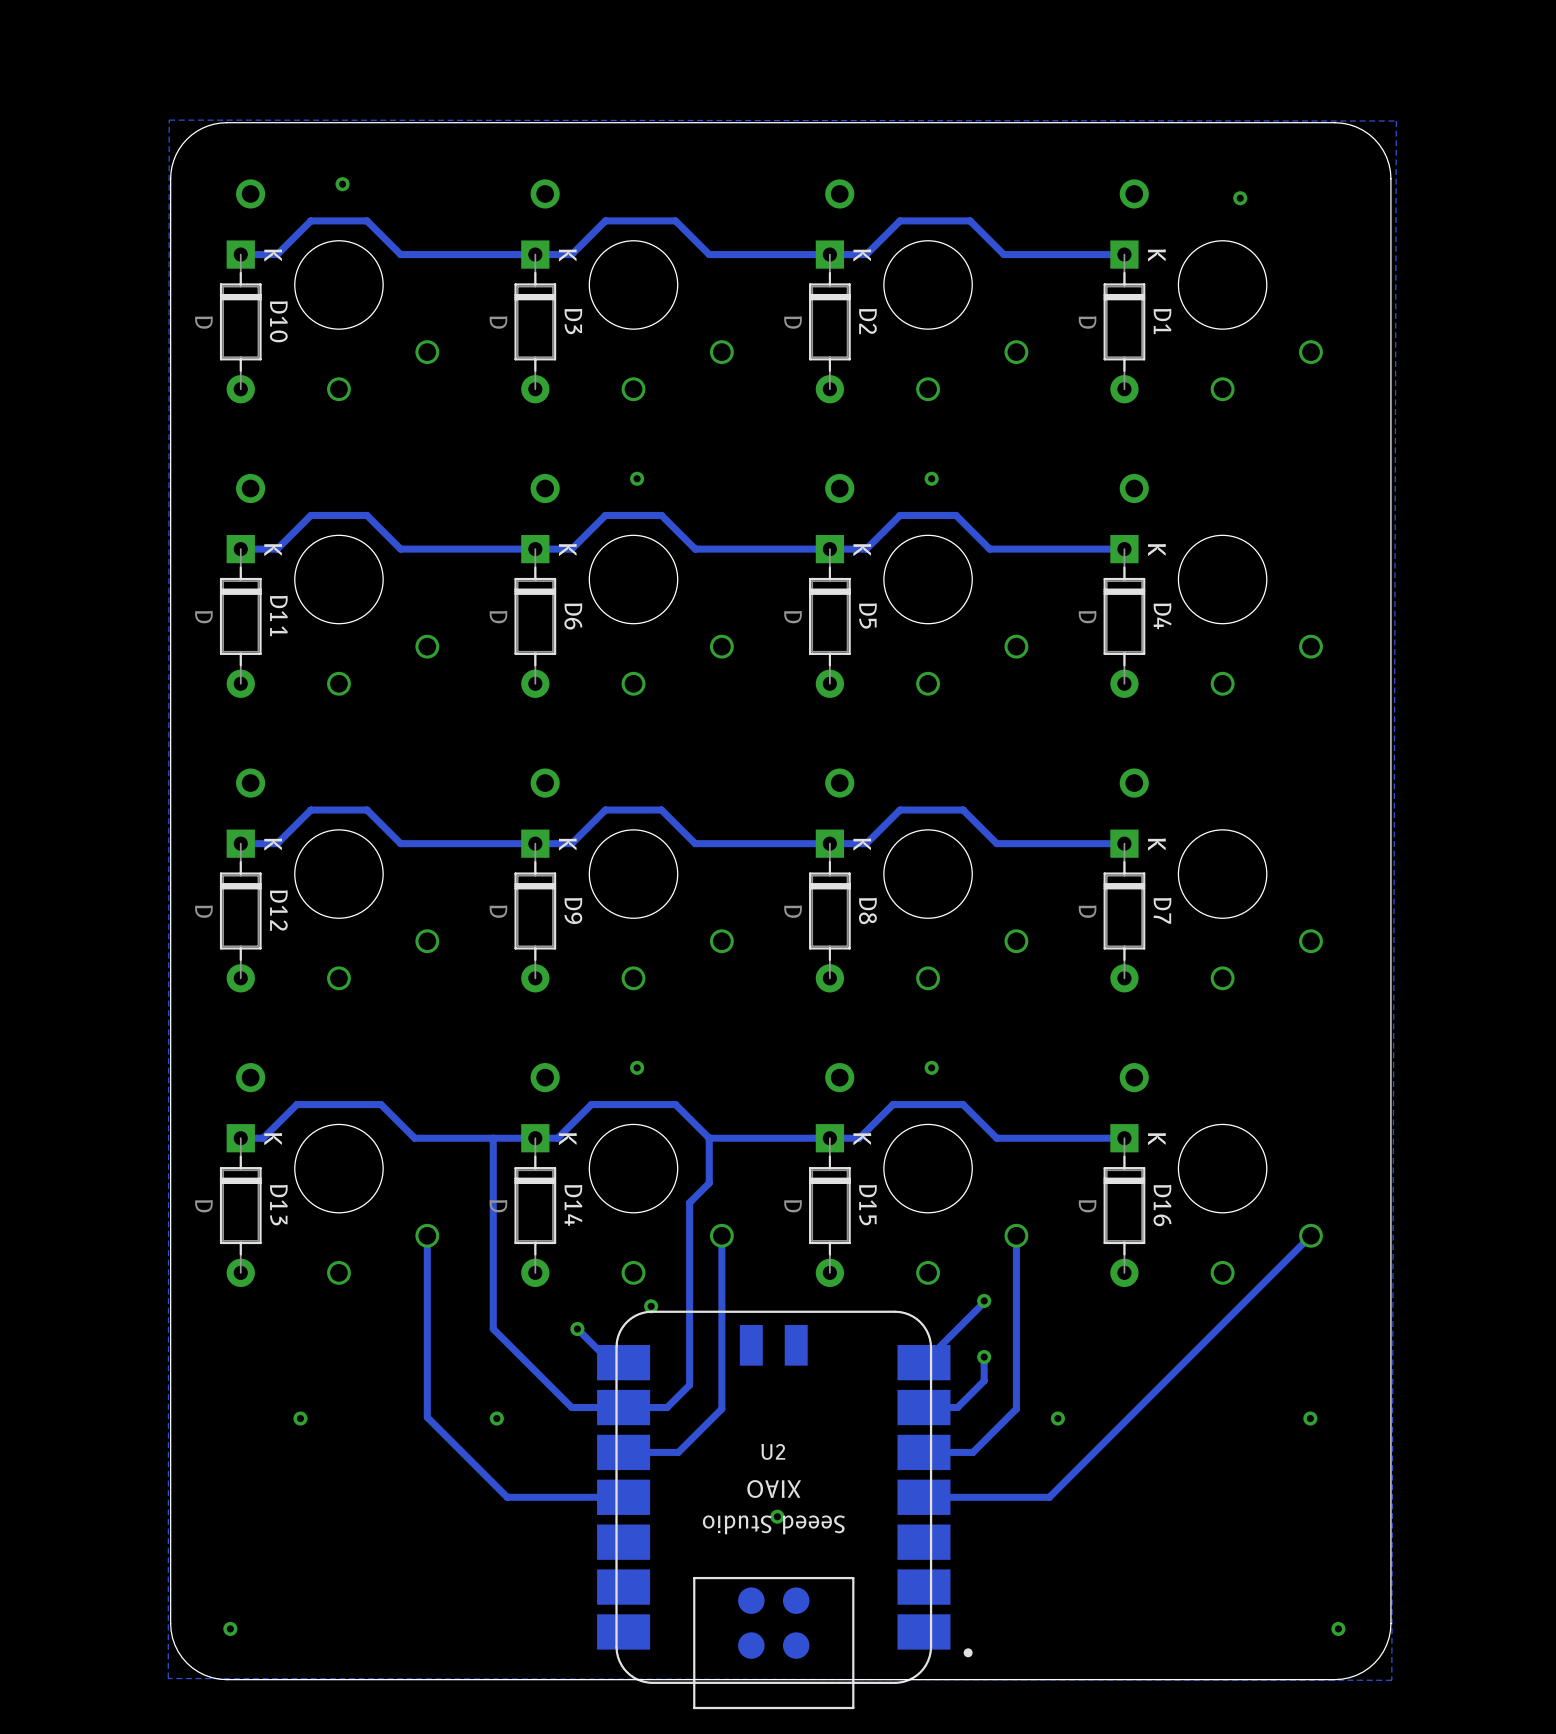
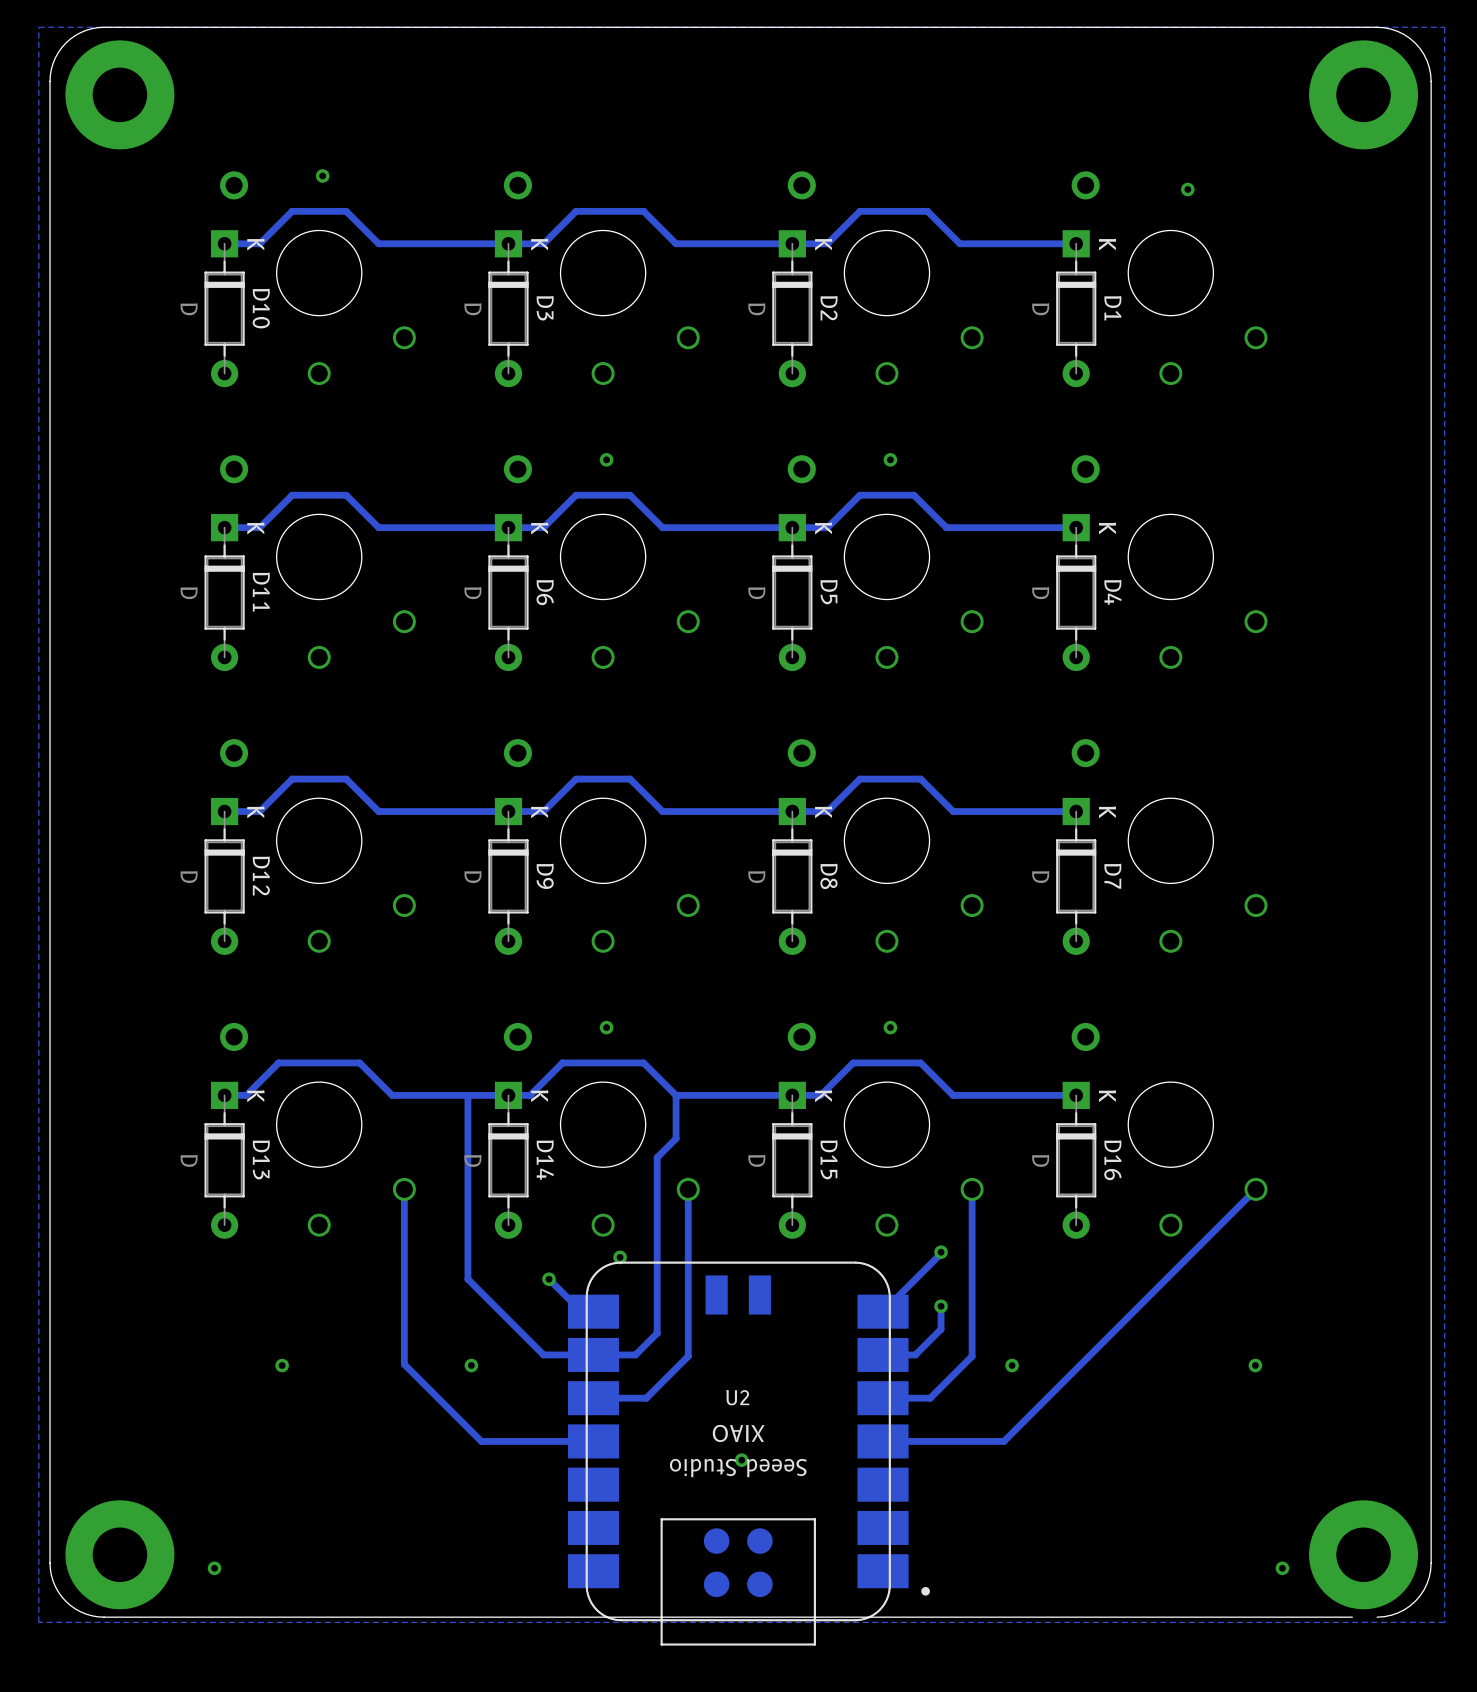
part: none -> (119, 94)
part: none -> (1363, 94)
zone outline: (169, 120) (168, 1678) (1391, 1680) (1396, 121) (169, 120) -> (1444, 27) (1444, 1622) (38, 1622) (38, 27) (1444, 27)
part: none -> (119, 1554)
part: none -> (1363, 1554)
board edge: (1334, 1679) (1356, 1675) (1374, 1663) (1386, 1645) (1390, 1623) (1390, 178) (1386, 157) (1374, 139) (1356, 126) (1334, 122) (226, 122) (202, 128) (182, 143) (173, 160) (170, 178) (170, 1623) (174, 1645) (187, 1663) (205, 1675) (226, 1679) -> (1377, 1617) (1397, 1613) (1415, 1601) (1427, 1583) (1431, 1563) (1431, 81) (1429, 67) (1419, 48) (1409, 38) (1397, 31) (1377, 27) (98, 27) (80, 32) (61, 47) (53, 63) (50, 81) (50, 1569) (53, 1580) (61, 1596) (75, 1608) (86, 1614) (104, 1617) (211, 1617)
board edge: none -> (1352, 1617) (1278, 1617)

